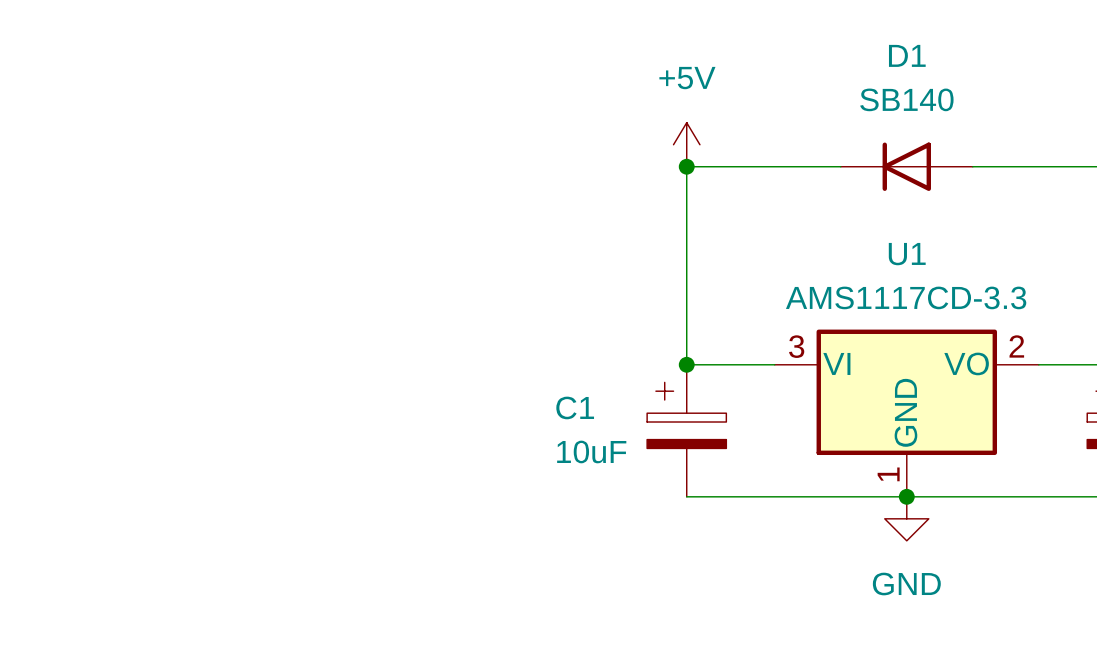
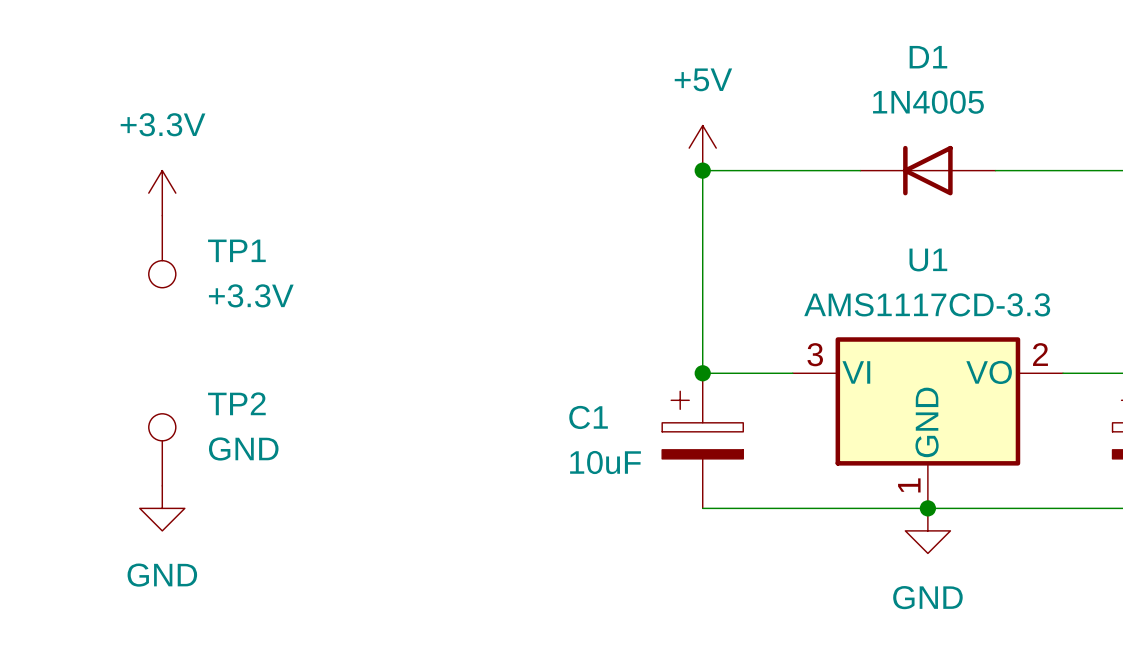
D1 value: SB140 (906, 99) -> 1N4005 (928, 102)
power symbol: none -> +3.3V (162, 193)
TP1: none -> +3.3V (162, 251)
TP2: none -> GND (162, 449)
power symbol: none -> GND (162, 508)

